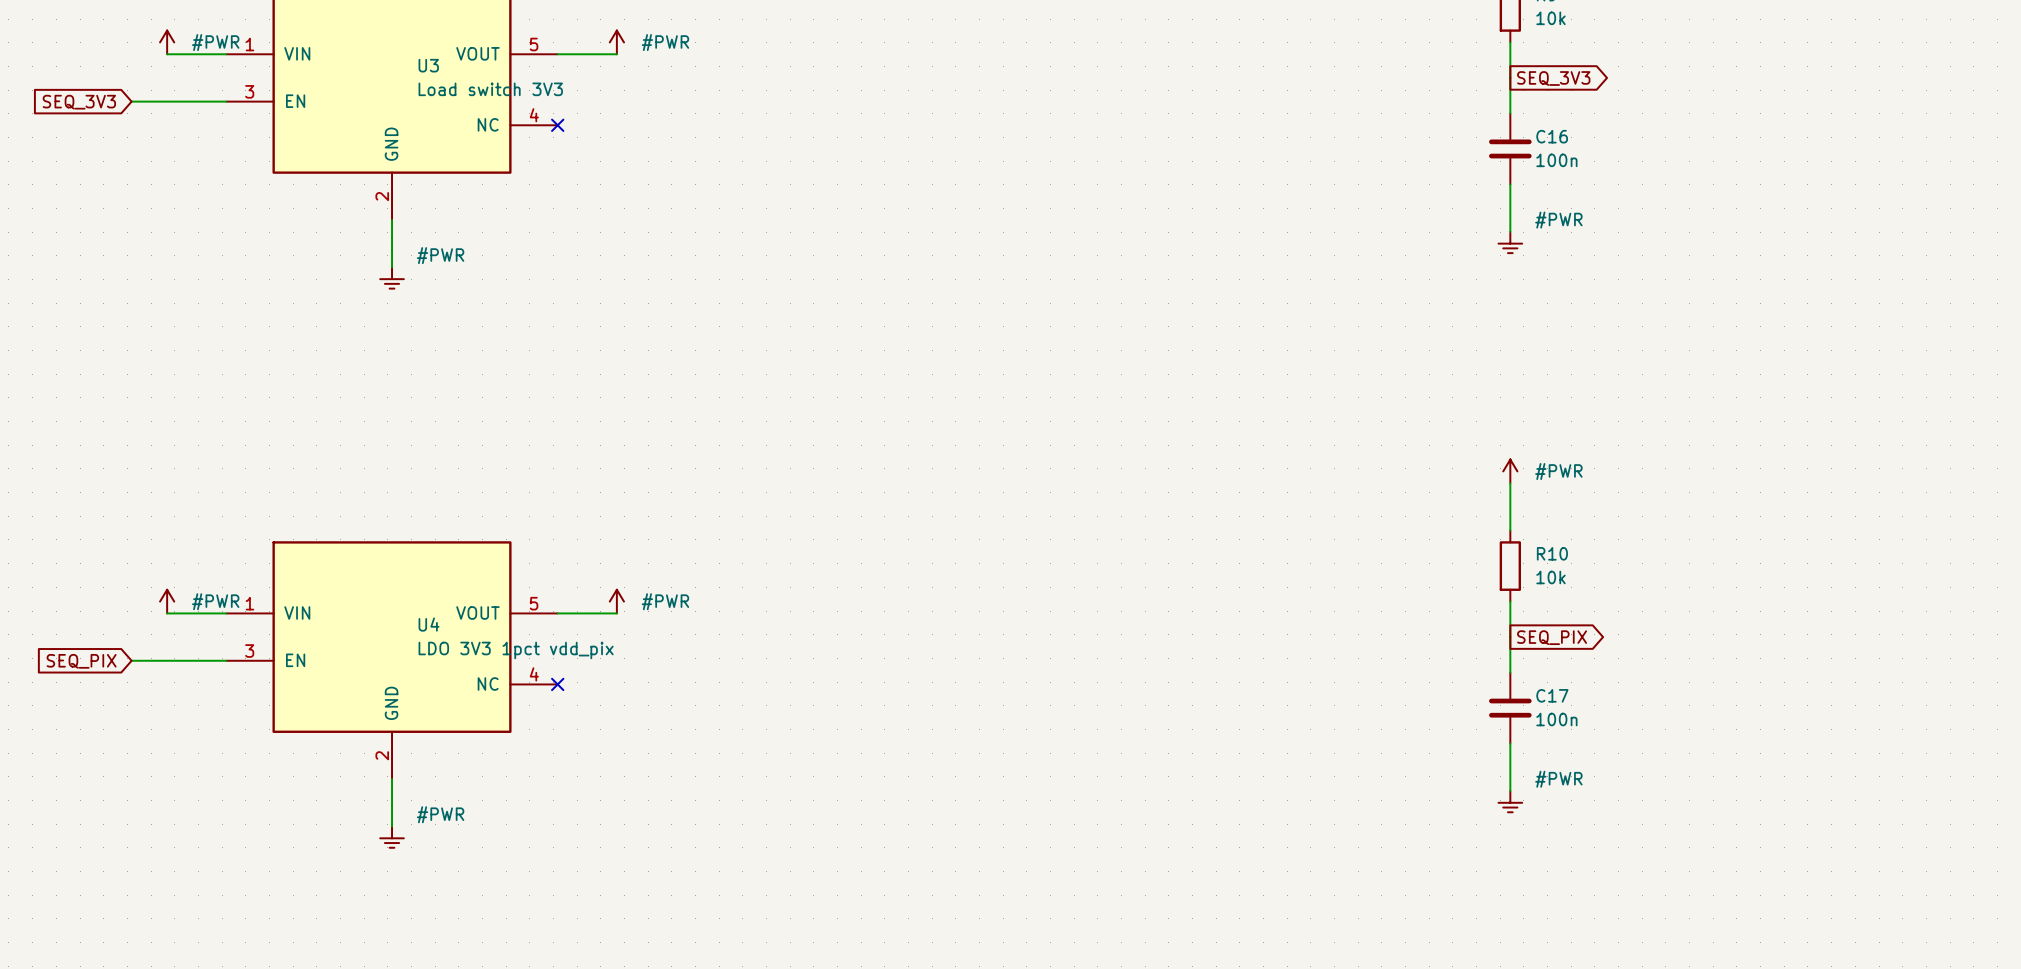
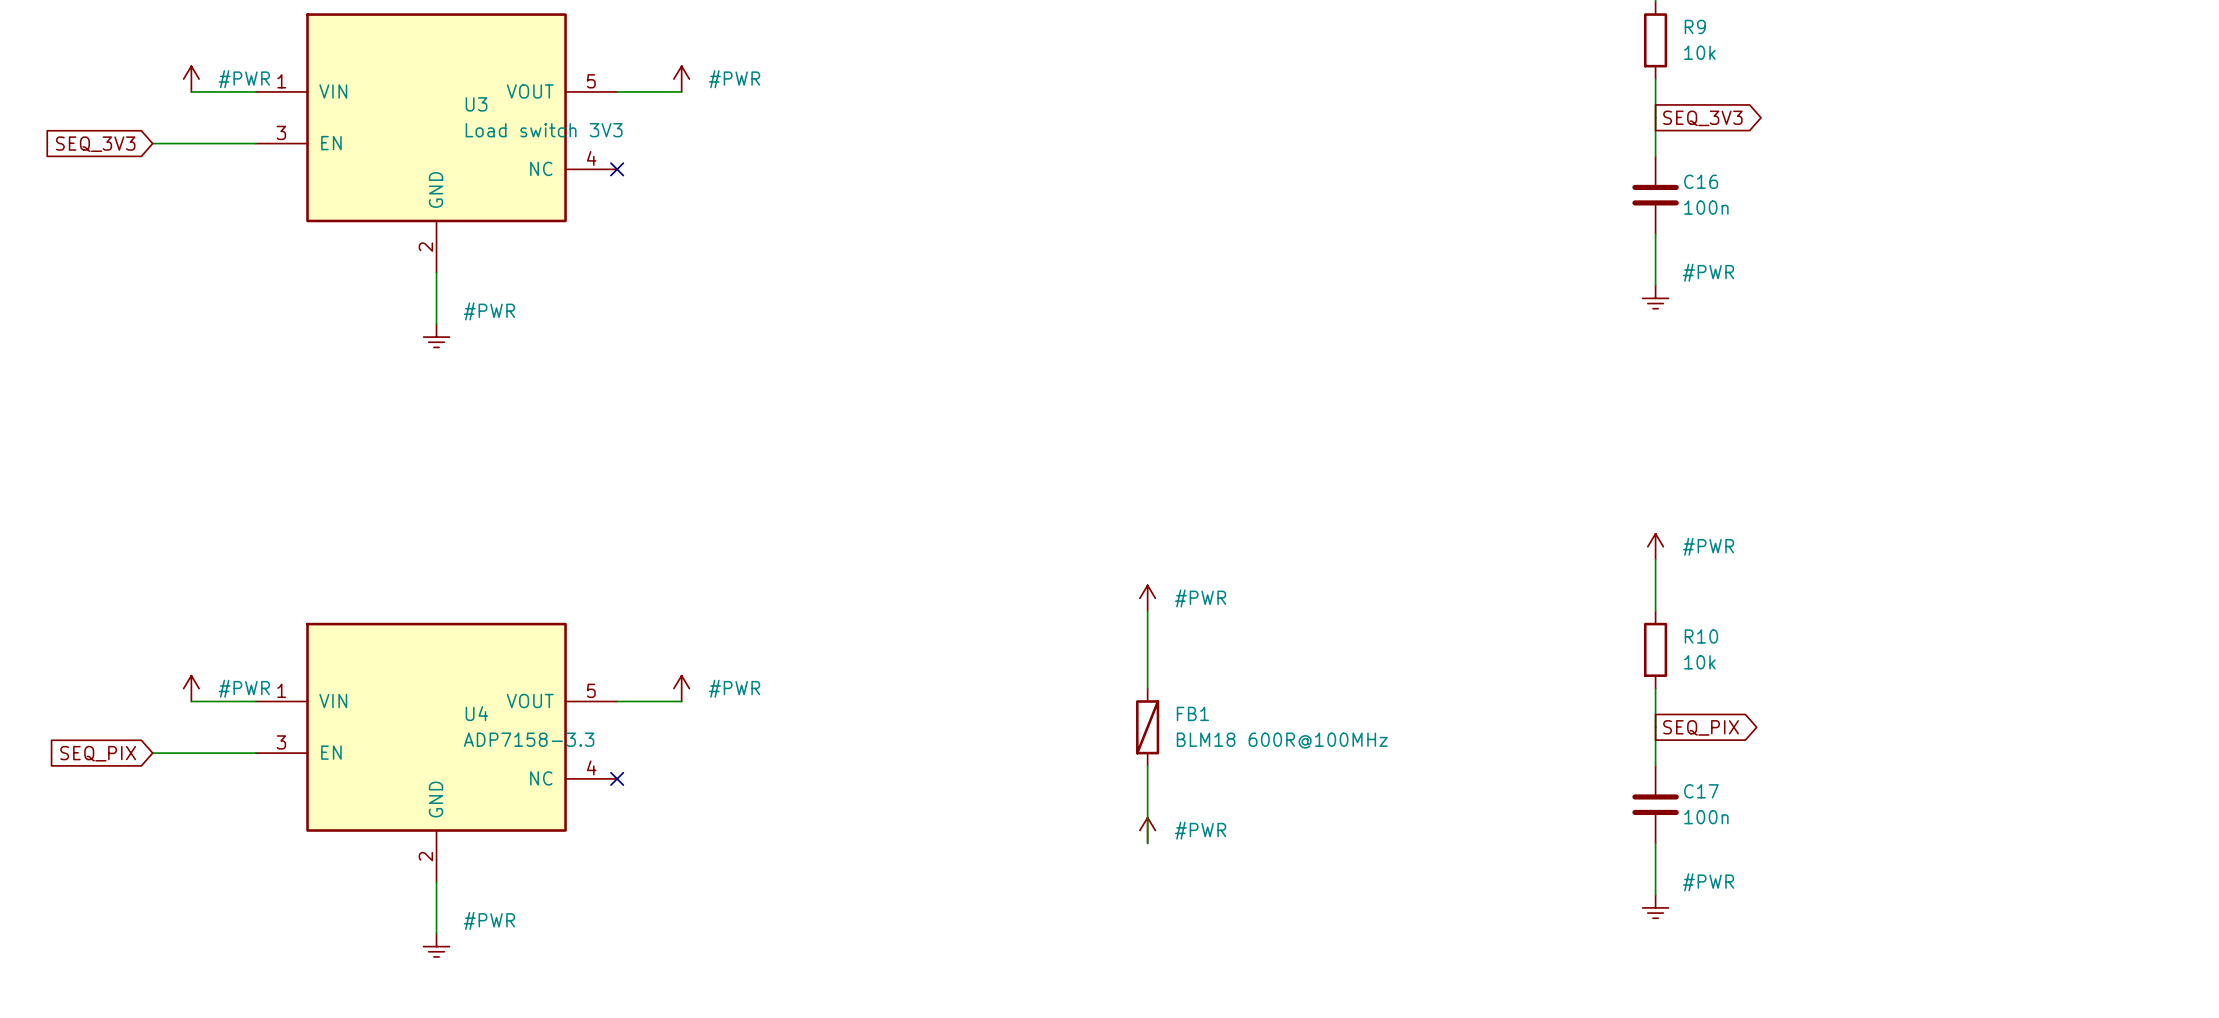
#PWR: none -> (1147, 598)
wire: none -> (1147, 611) (1147, 688)
FB1: none -> BLM18 600R@100MHz (1147, 727)
U4 value: LDO 3V3 1pct vdd_pix (516, 650) -> ADP7158-3.3 (529, 739)
wire: none -> (1147, 766) (1147, 843)
#PWR: none -> (1147, 830)

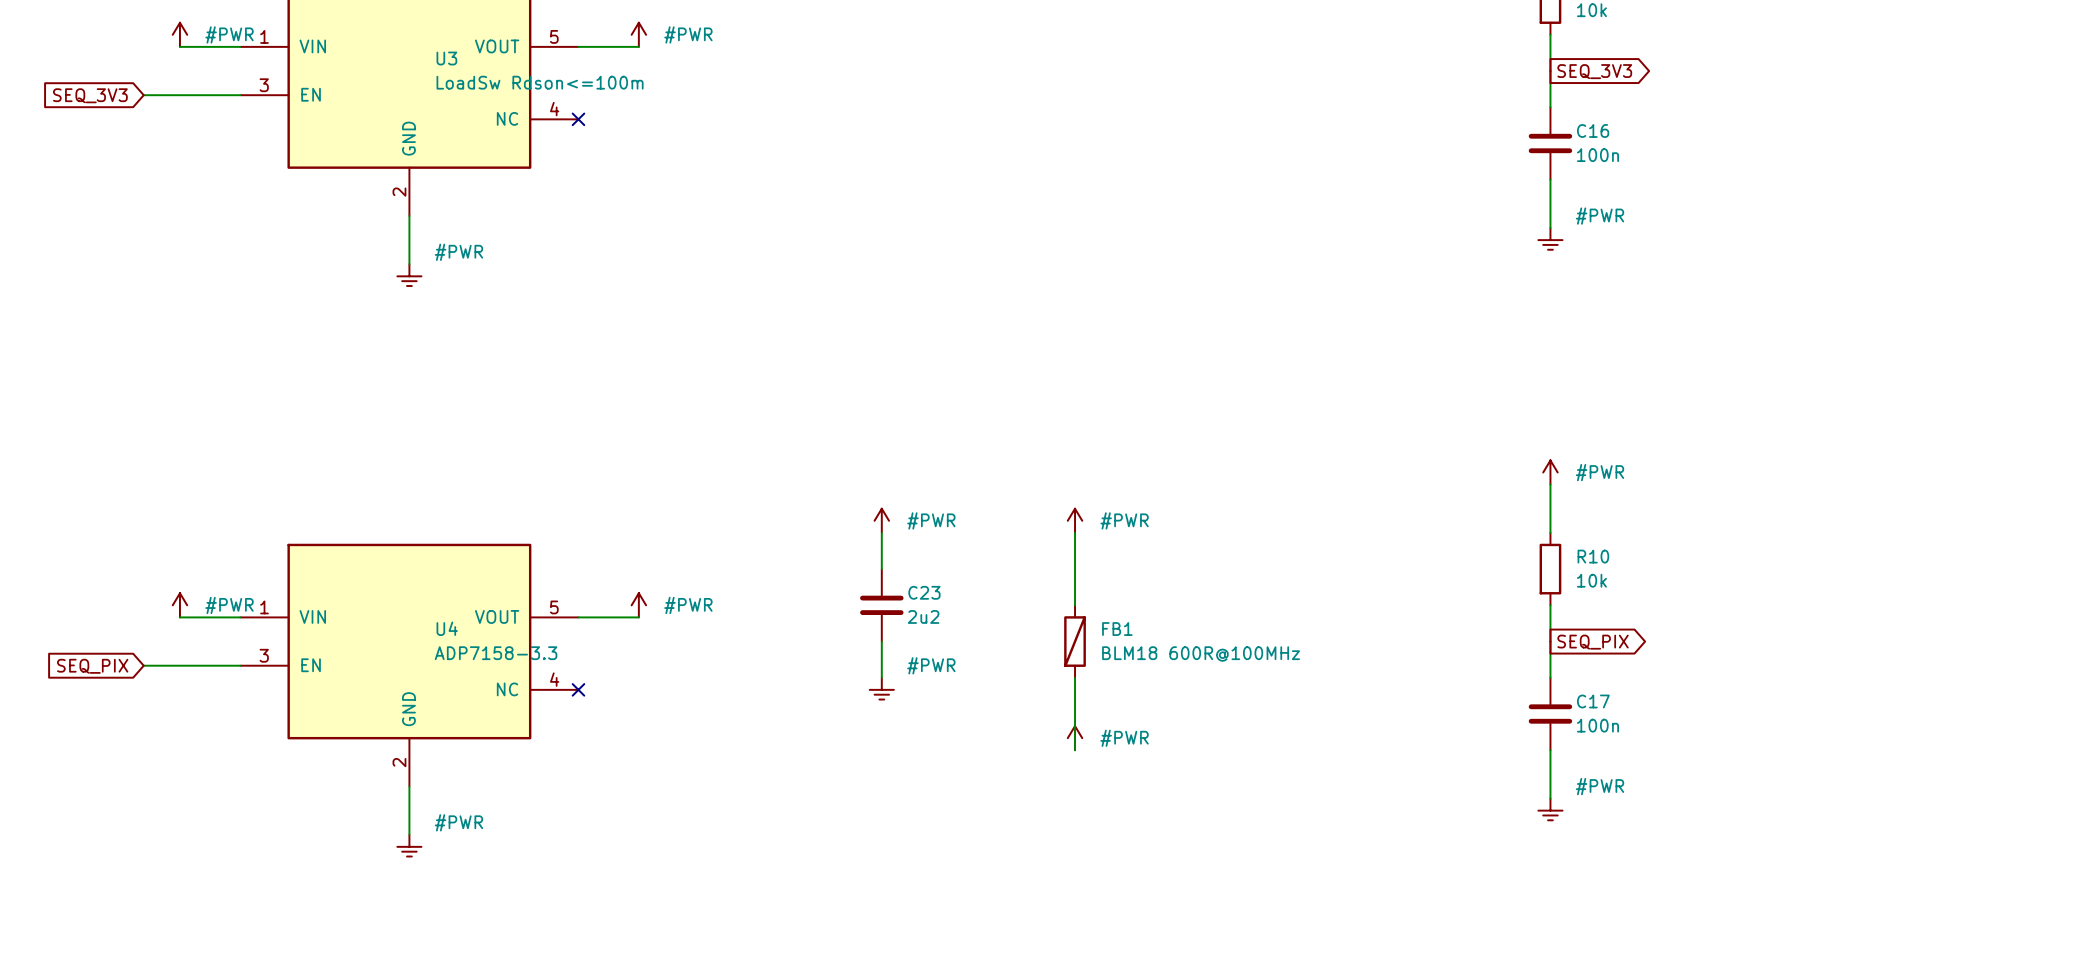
U3 value: Load switch 3V3 (544, 130) -> LoadSw Rdson<=100m (540, 82)
#PWR: none -> (881, 520)
wire: none -> (881, 532) (881, 569)
C23: none -> 2u2 (881, 605)
wire: none -> (881, 641) (881, 677)
#PWR: none -> (881, 688)

